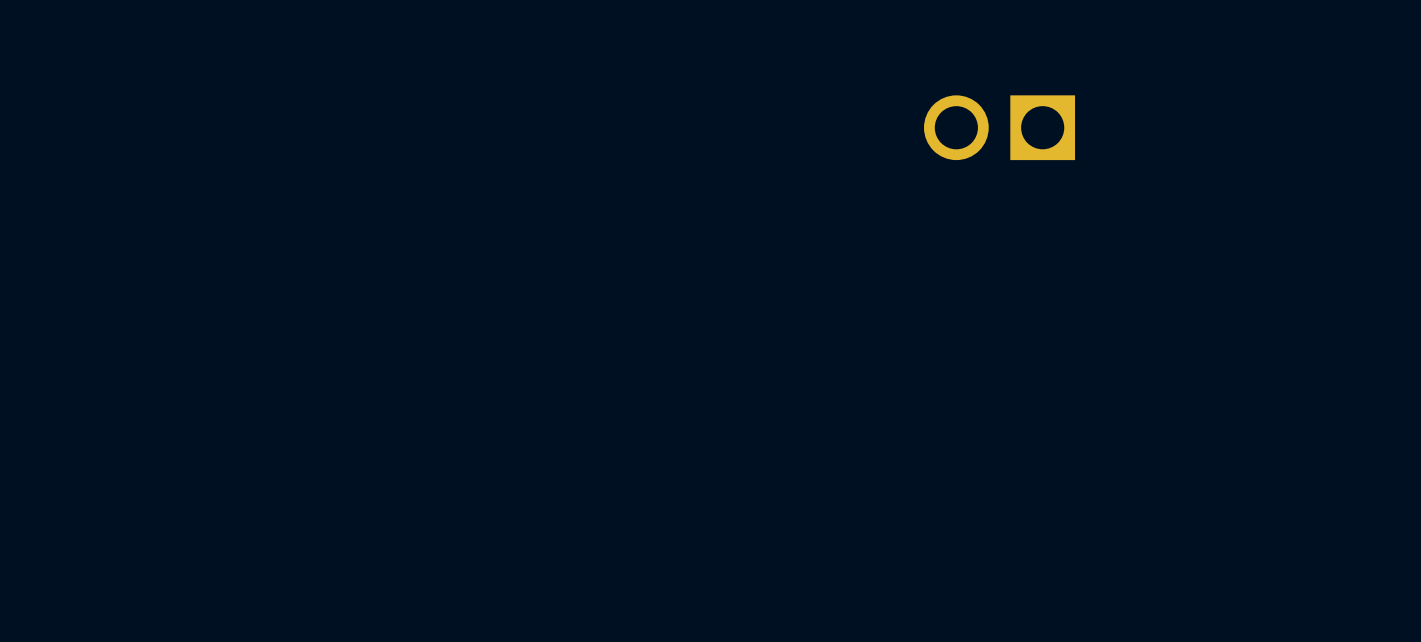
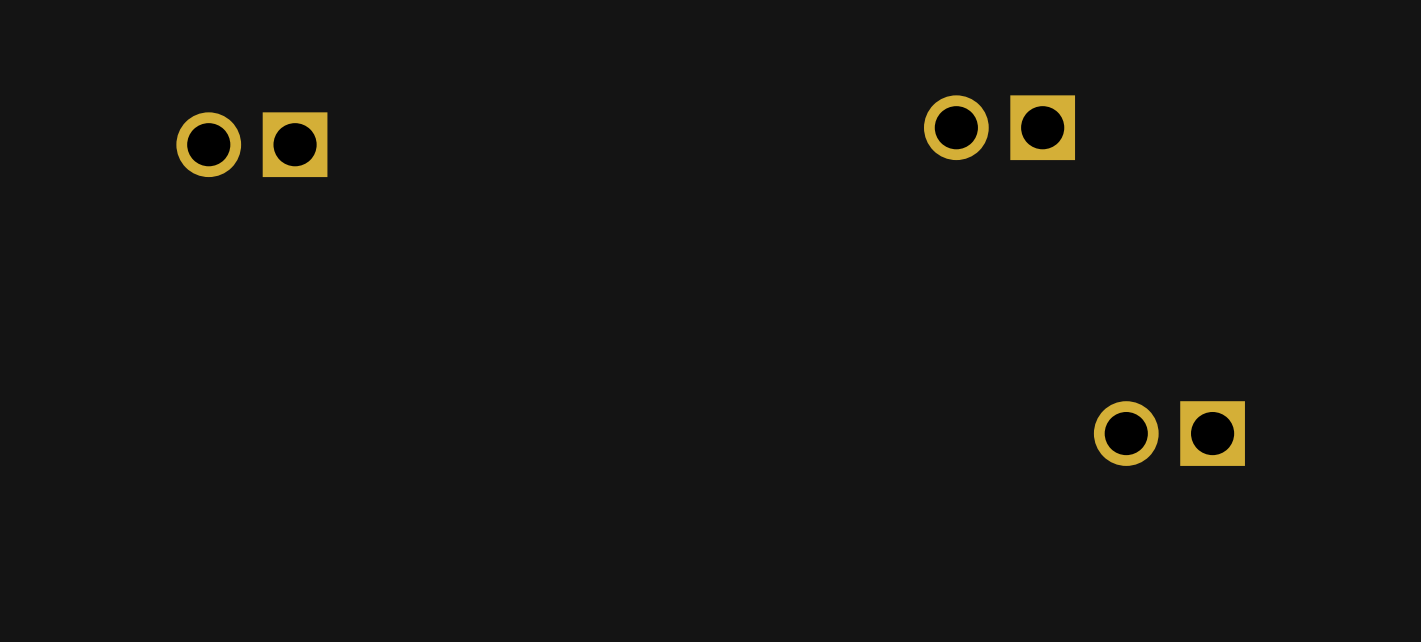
part: none -> (251, 144)
part: none -> (1169, 433)

